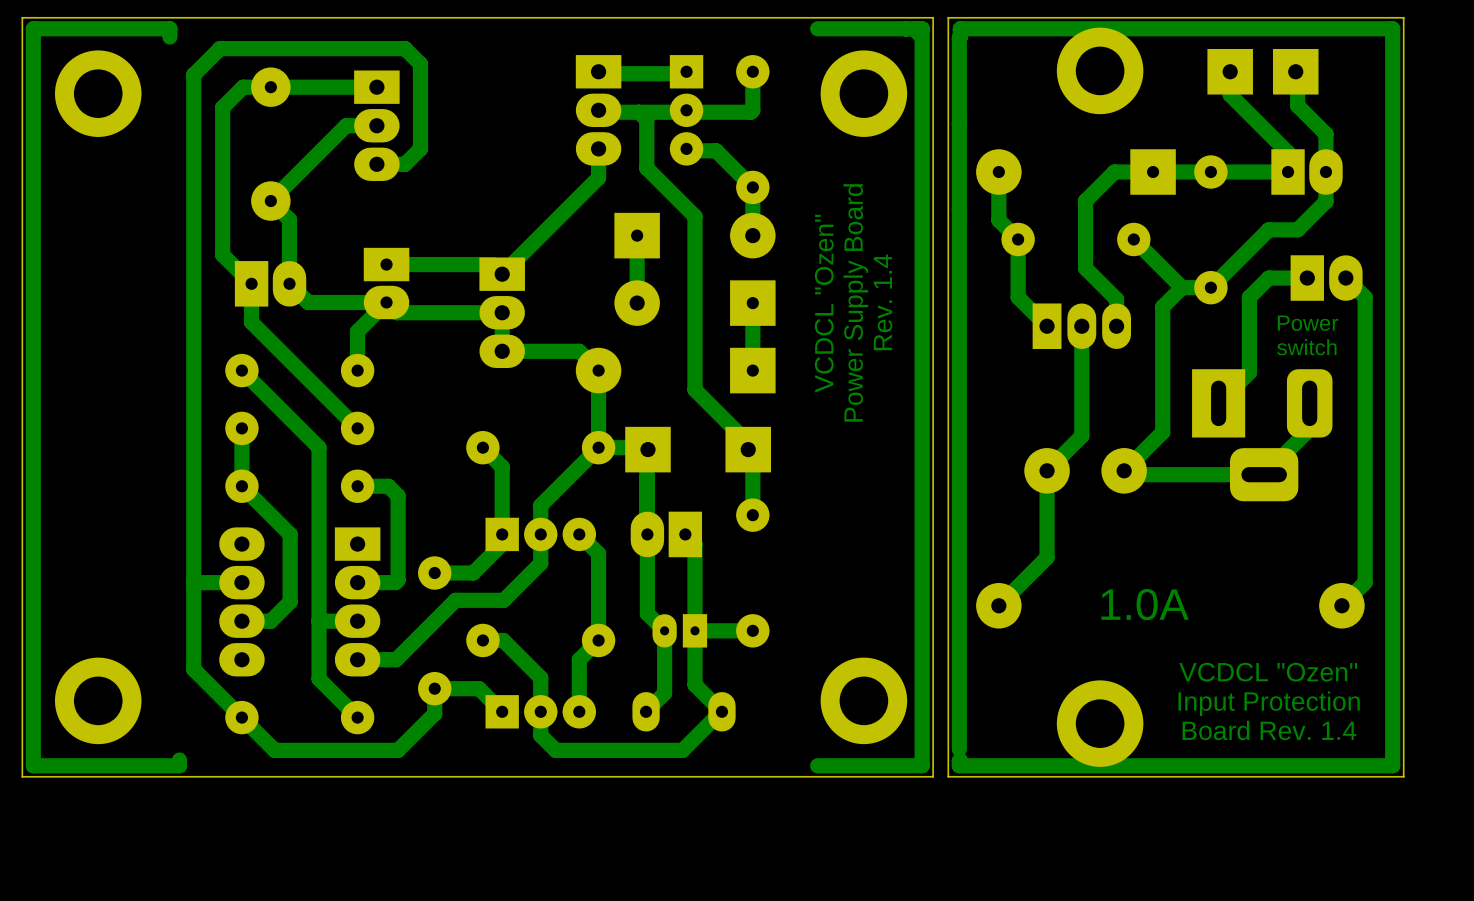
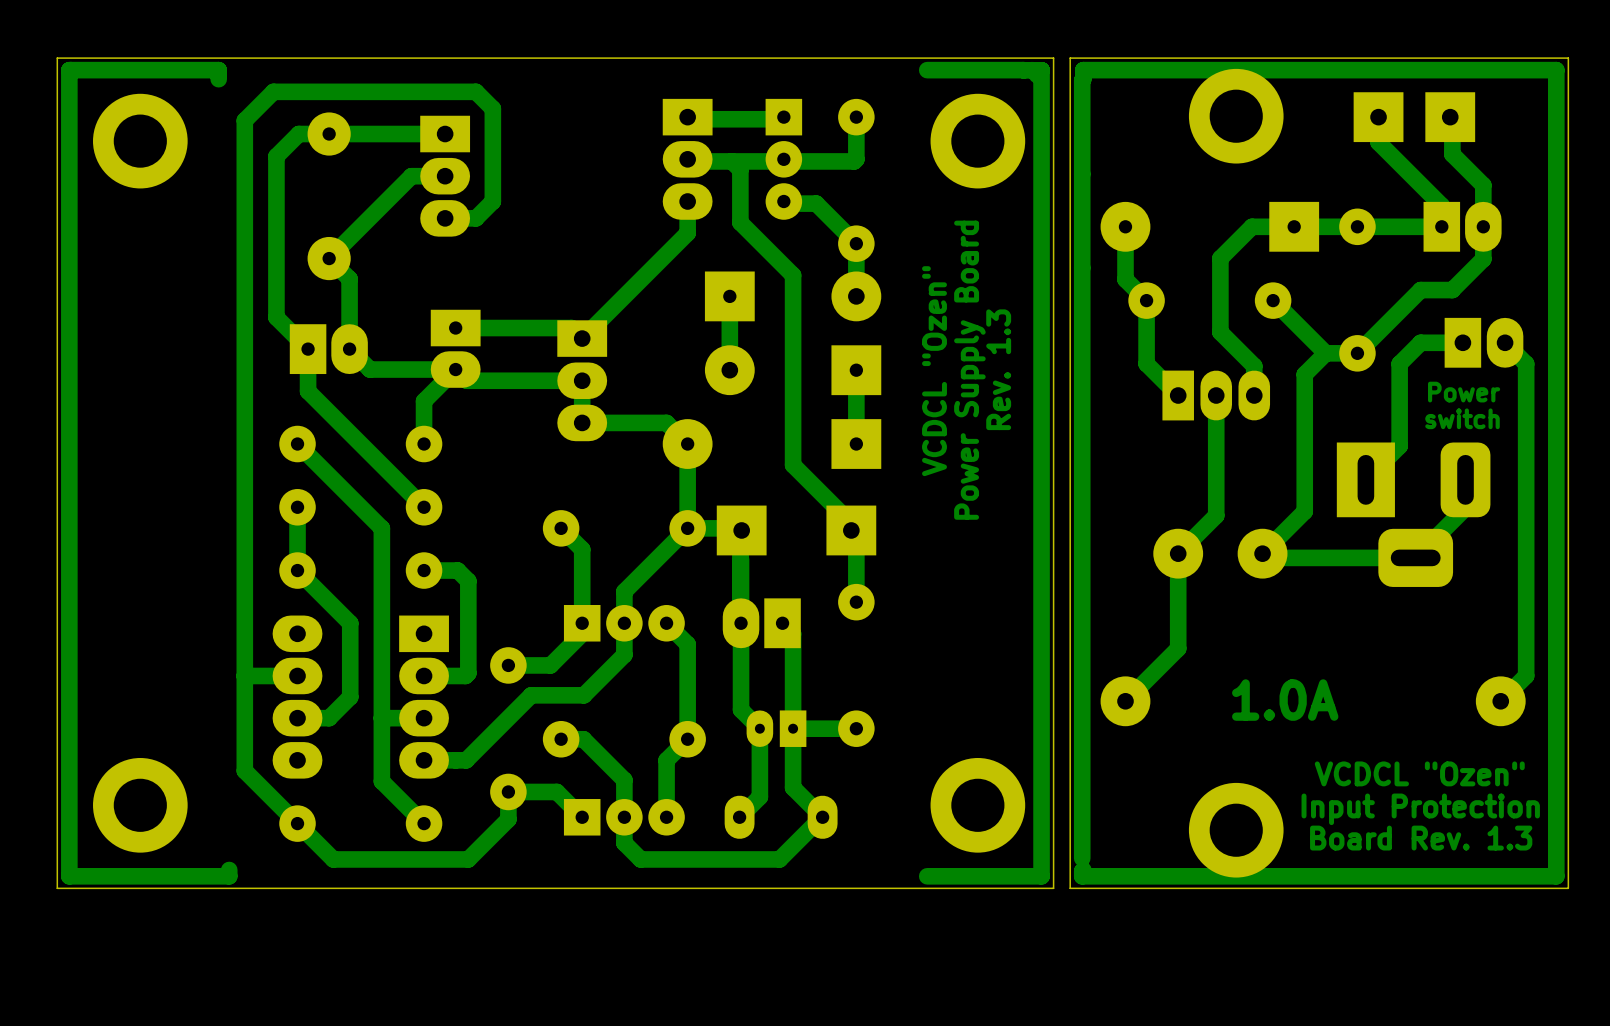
text: Rev. 1.4 (883, 302) -> Rev. 1.3 (998, 369)
text: Board Rev. 1.4 (1269, 730) -> Board Rev. 1.3 (1421, 838)

